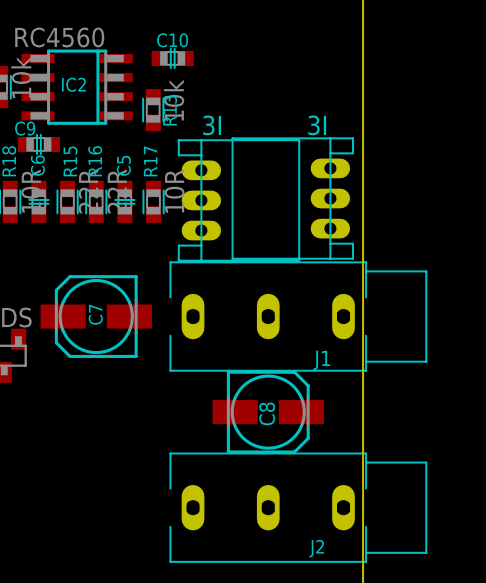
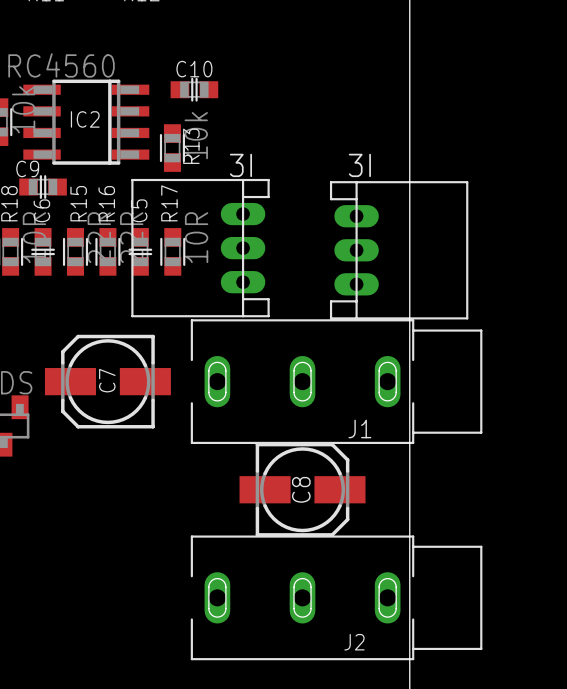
part: none -> (200, 248)
part: (292, 198) -> none
part: (239, 200) -> none
part: none -> (399, 250)

